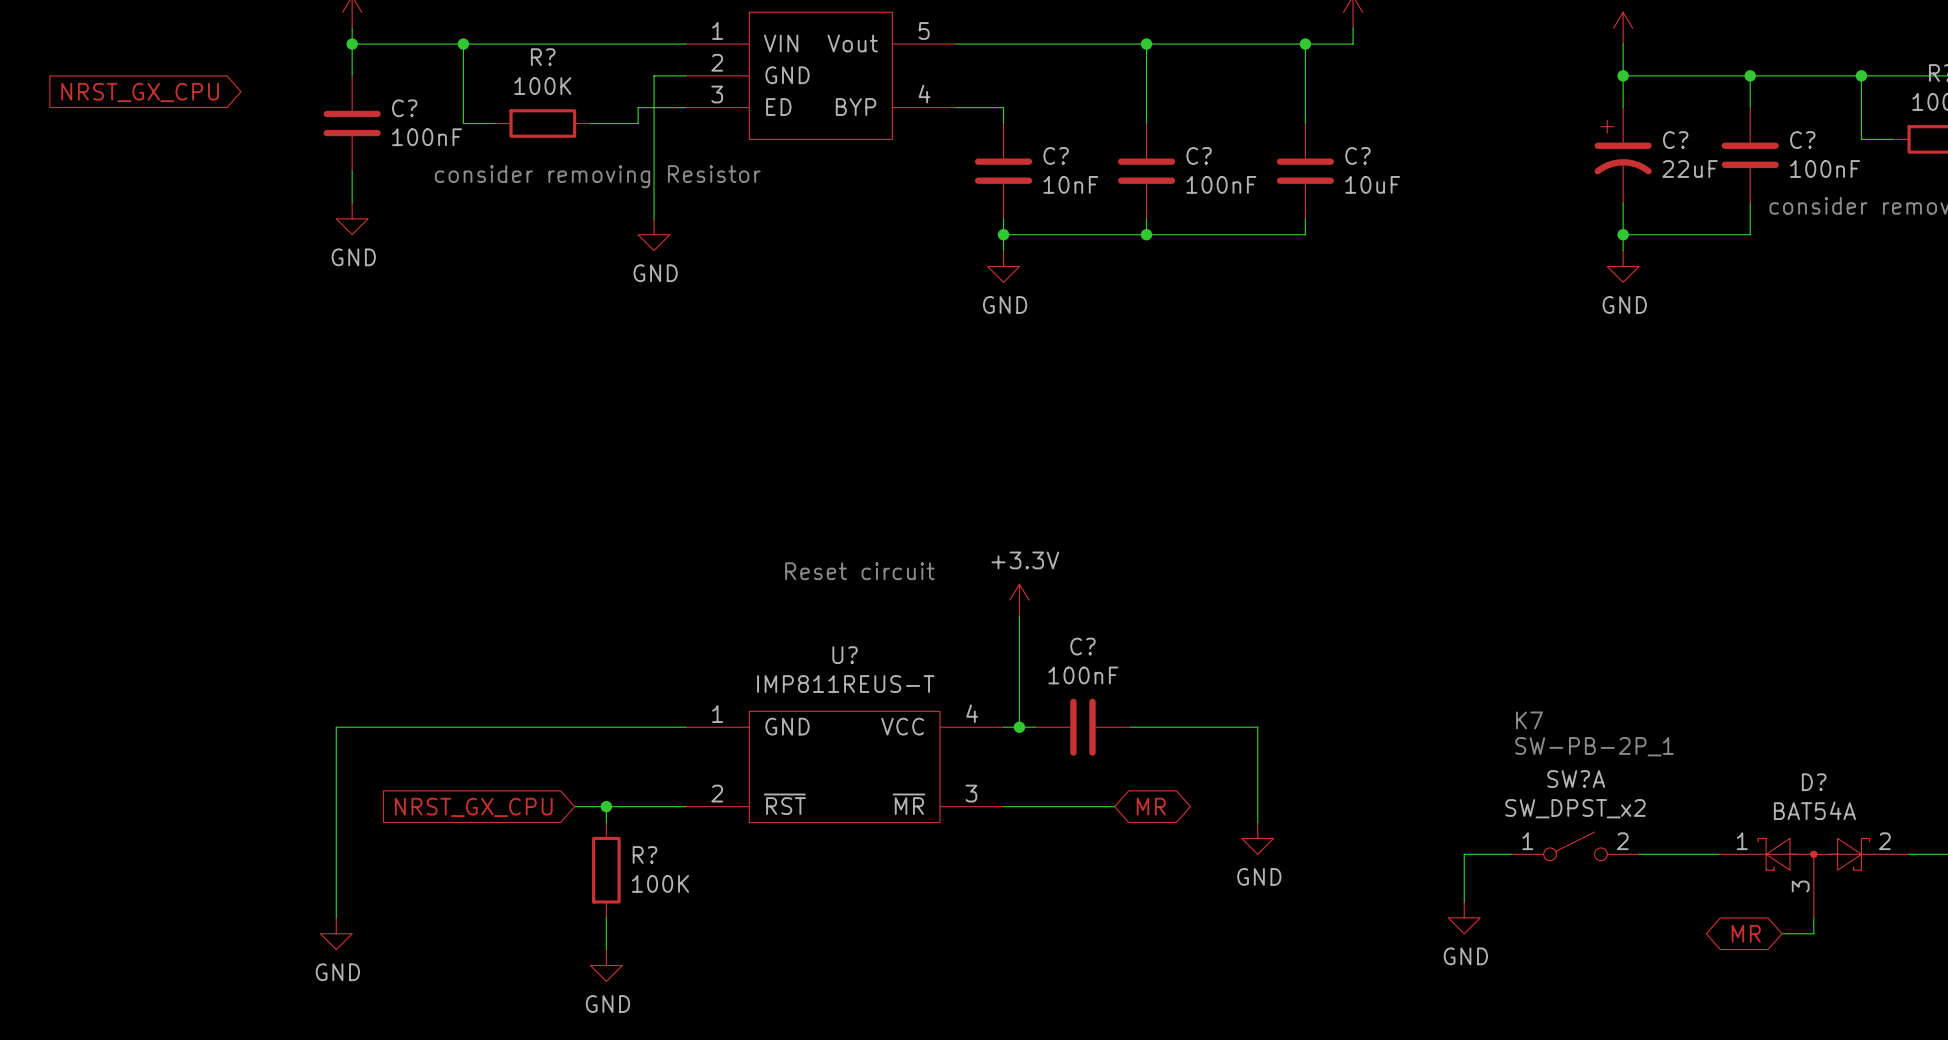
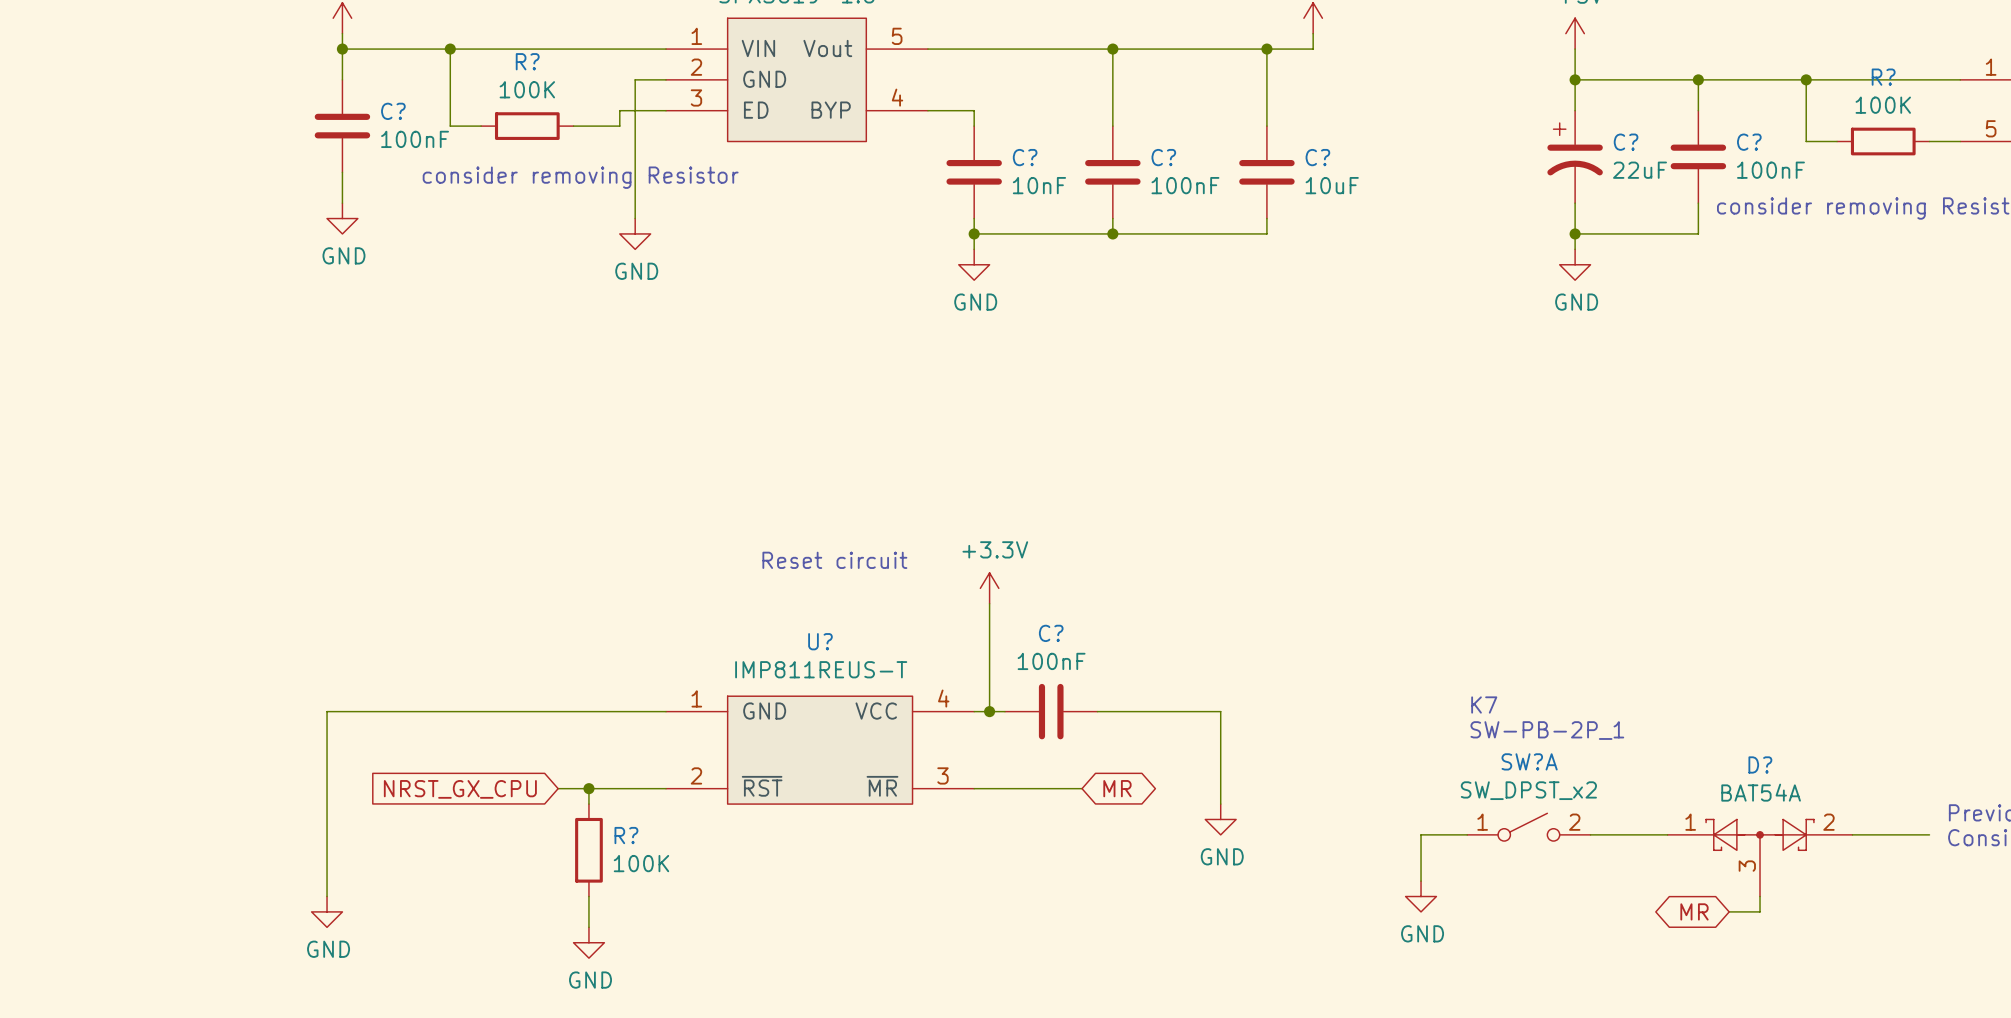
global label: NRST_GX_CPU (140, 92) -> none

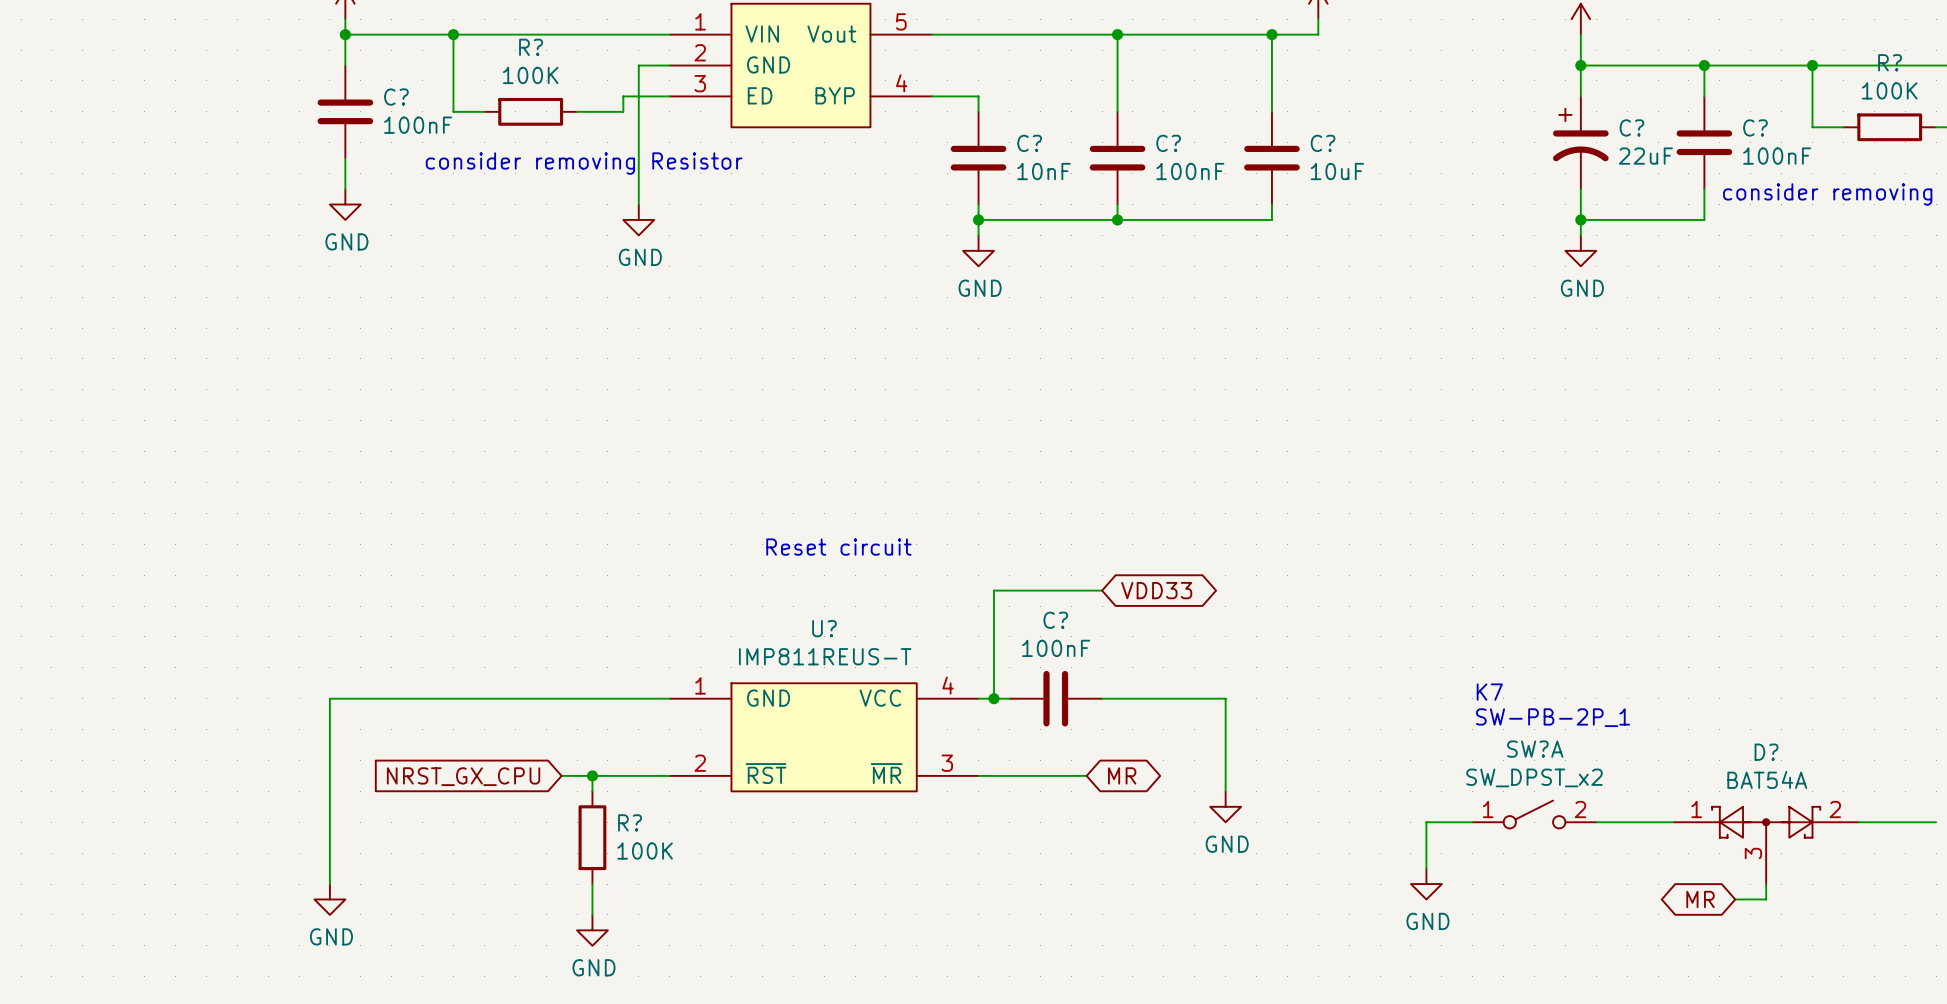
power symbol: +3.3V (989, 588) -> none
wire: none -> (993, 590) (1102, 590)
global label: none -> VDD33 (1156, 590)

